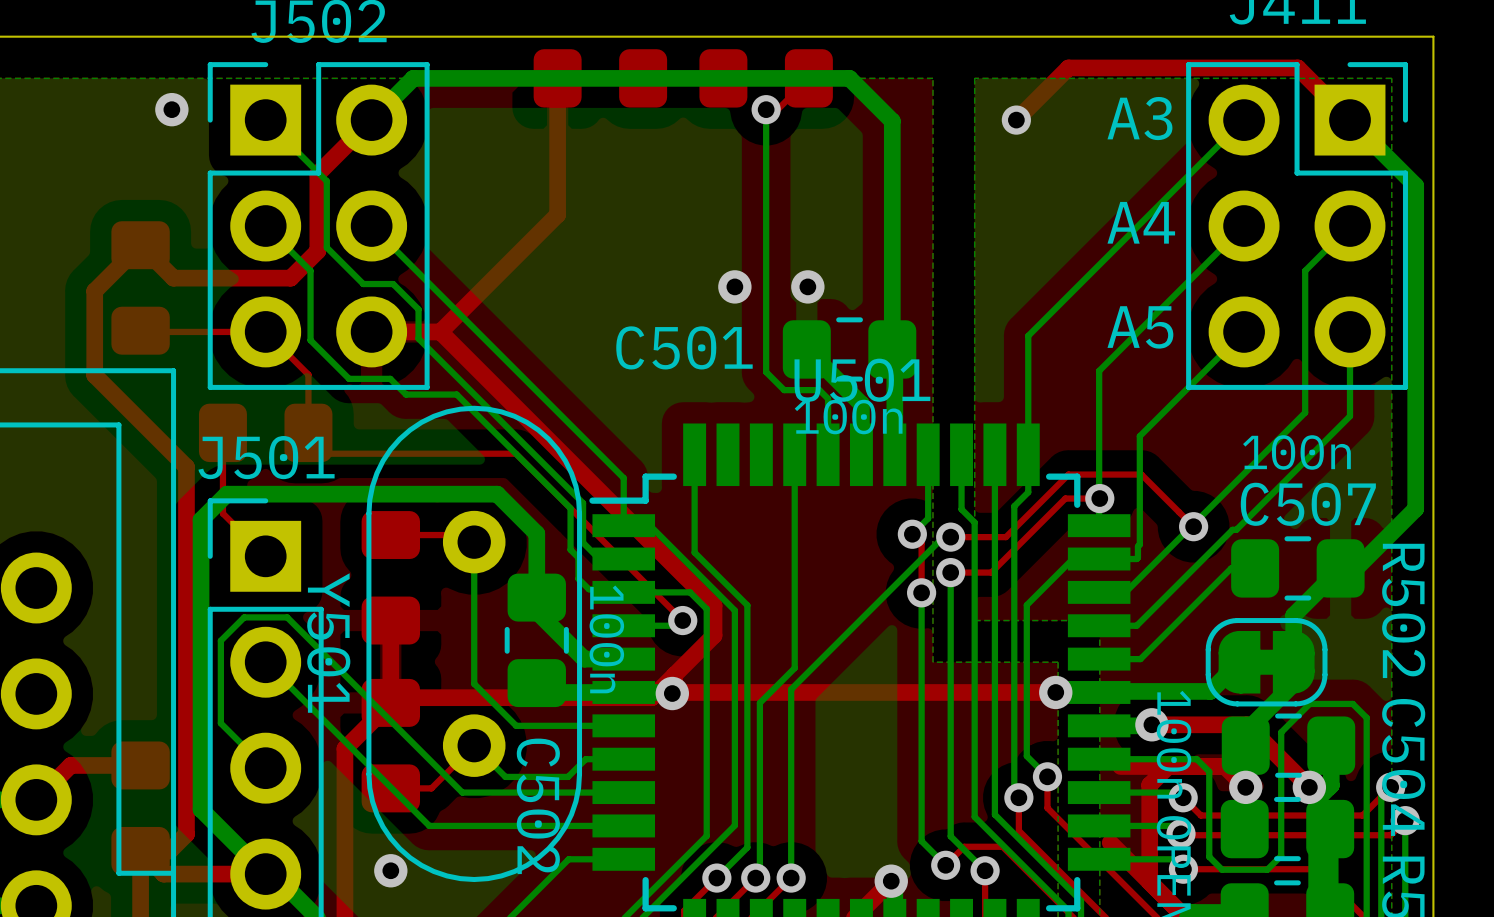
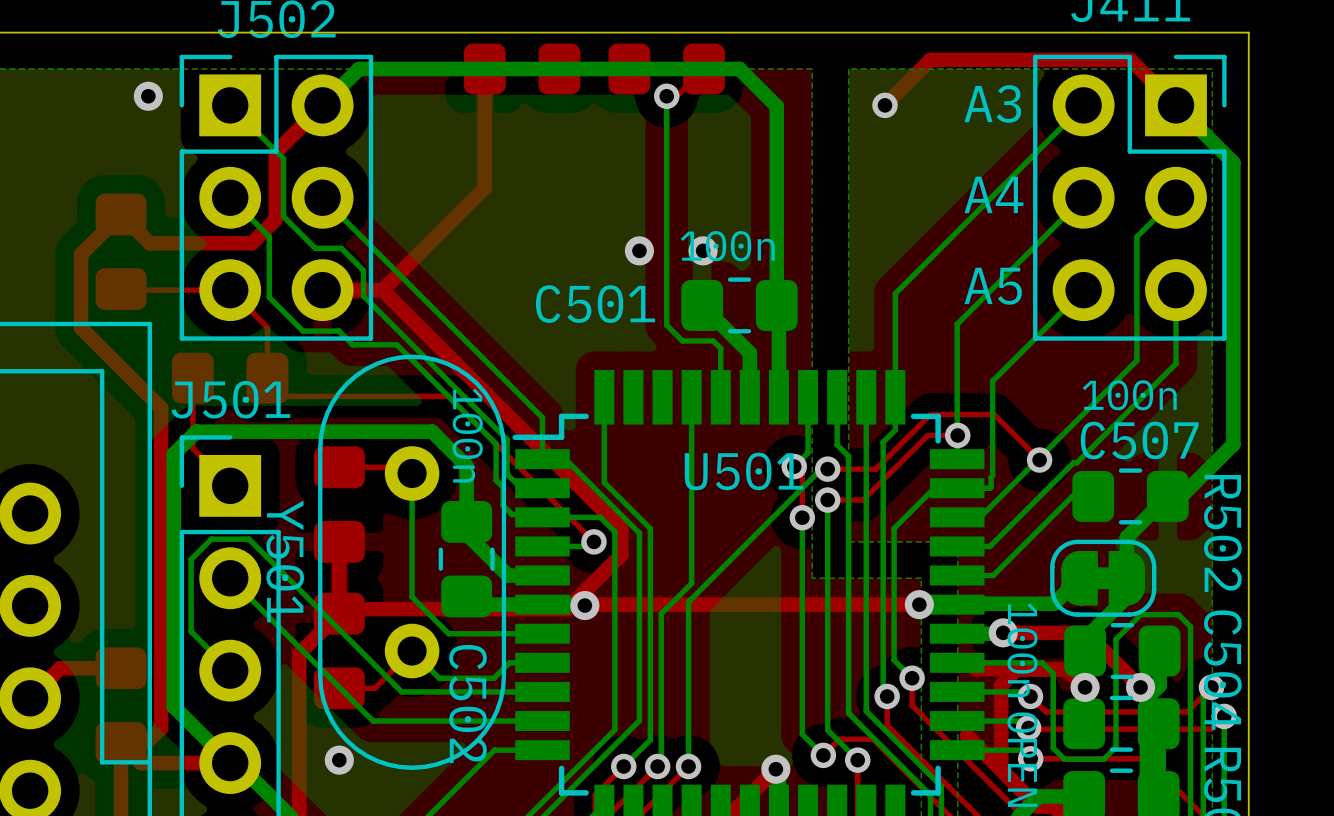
U501 name position: U501 (862, 380) -> U501 (743, 471)
C501 value position: 100n (848, 417) -> 100n (727, 246)
C502 value position: 100n (606, 639) -> 100n (467, 435)

